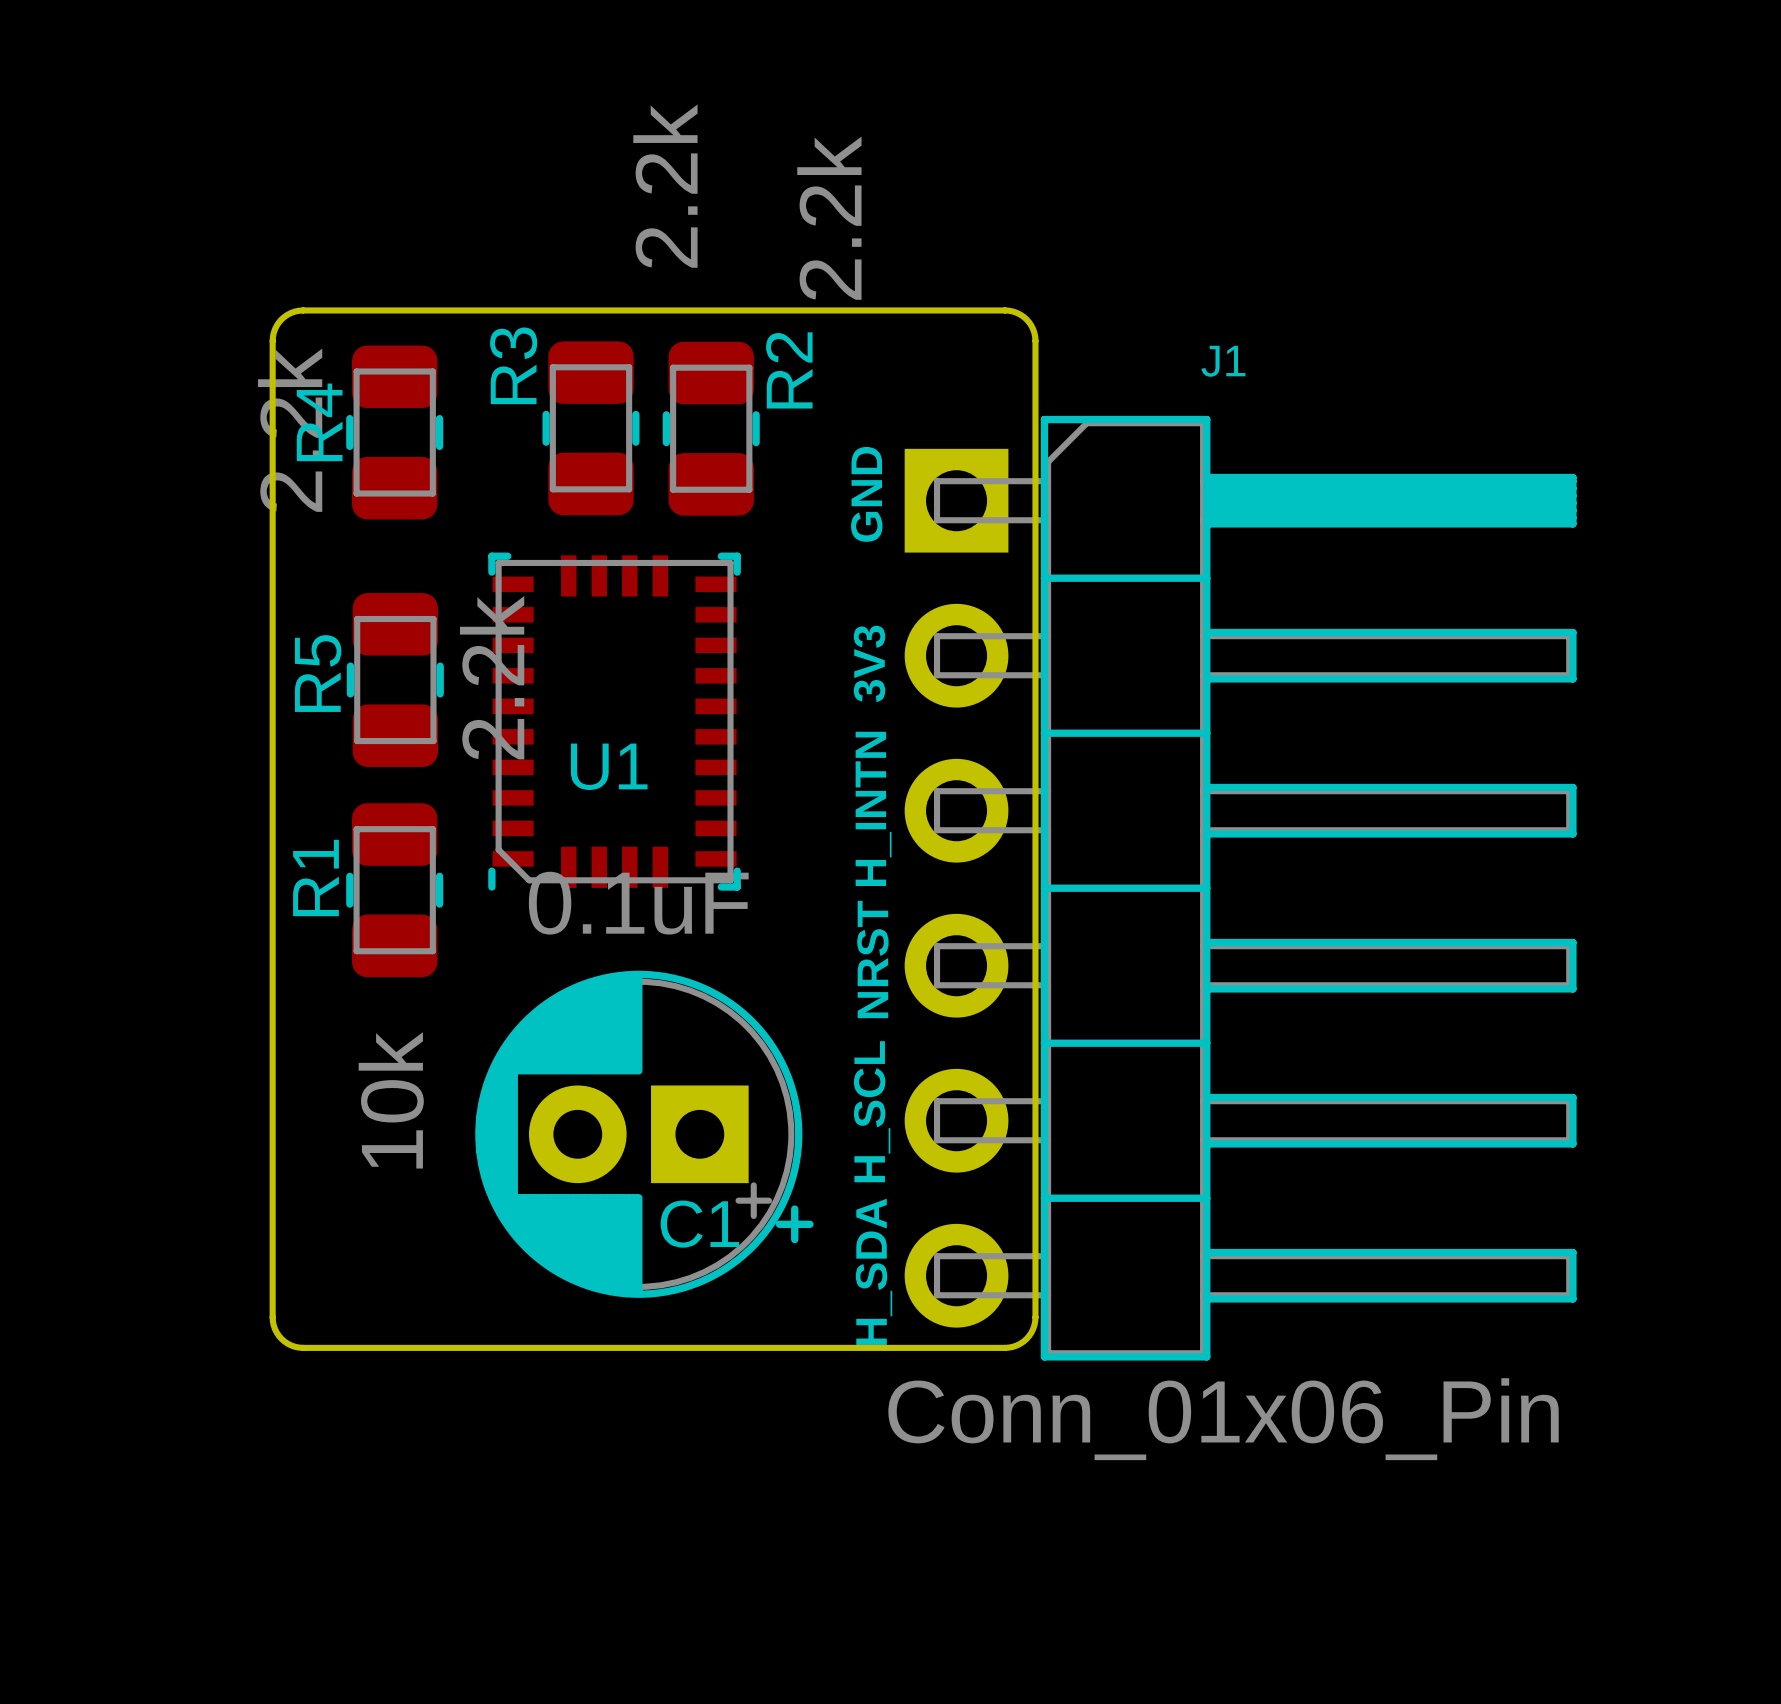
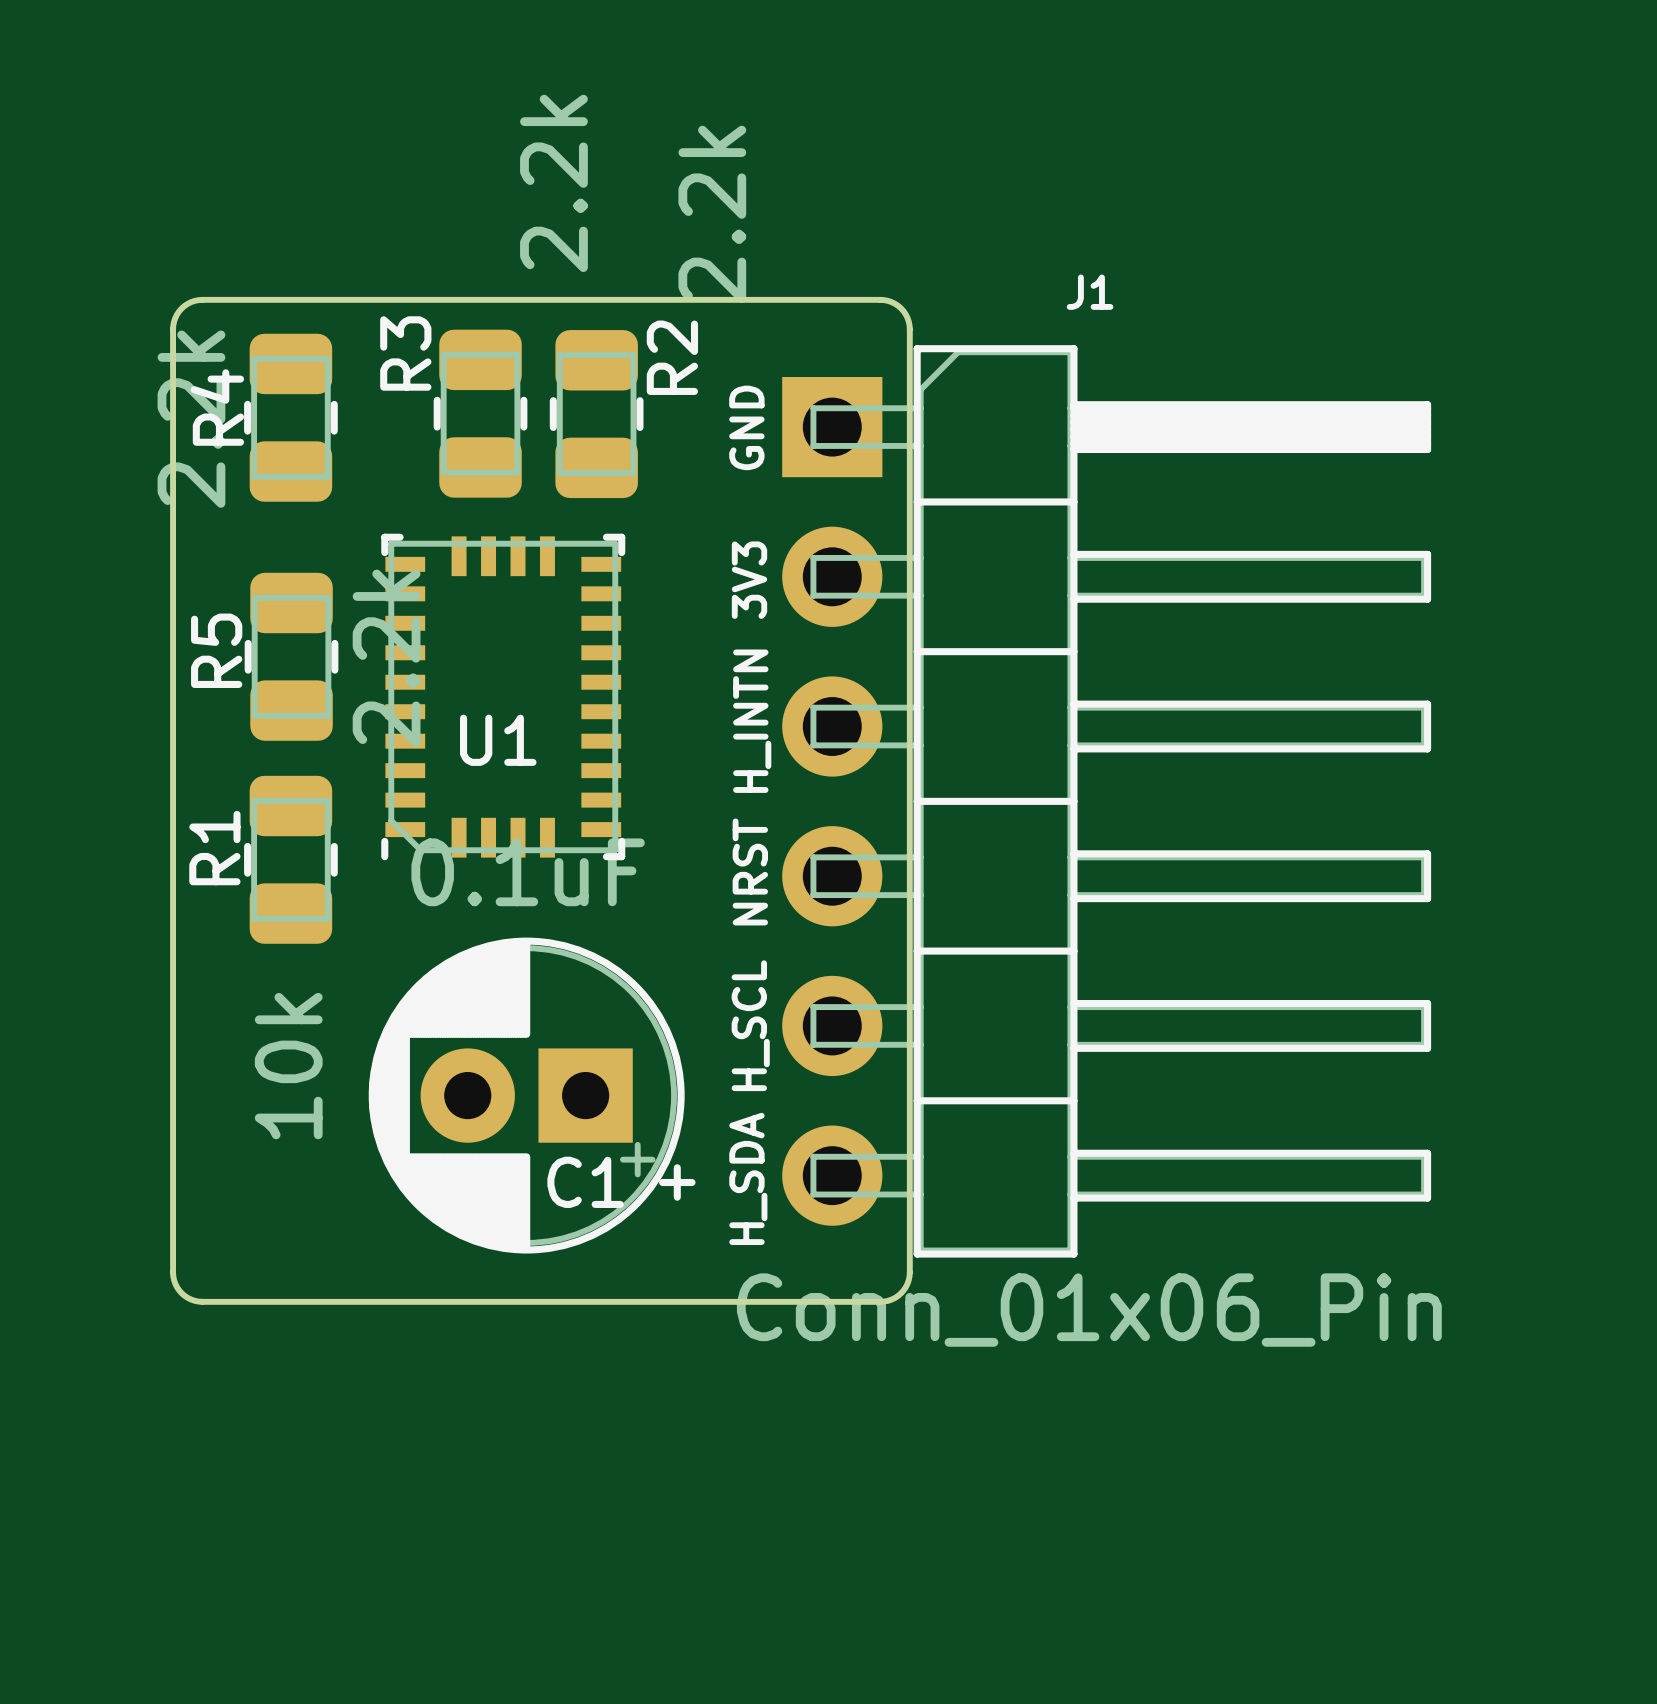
text position: GND (866, 494) -> GND (746, 427)
text position: 3V3 (869, 663) -> 3V3 (749, 580)
text position: H_INTN (873, 808) -> H_INTN (752, 721)
J1 position: (1240, 888) -> (1106, 801)
text position: NRST (872, 959) -> NRST (750, 871)
text position: H_SCL (872, 1111) -> H_SCL (750, 1025)
text position: H_SDA (874, 1271) -> H_SDA (748, 1178)

